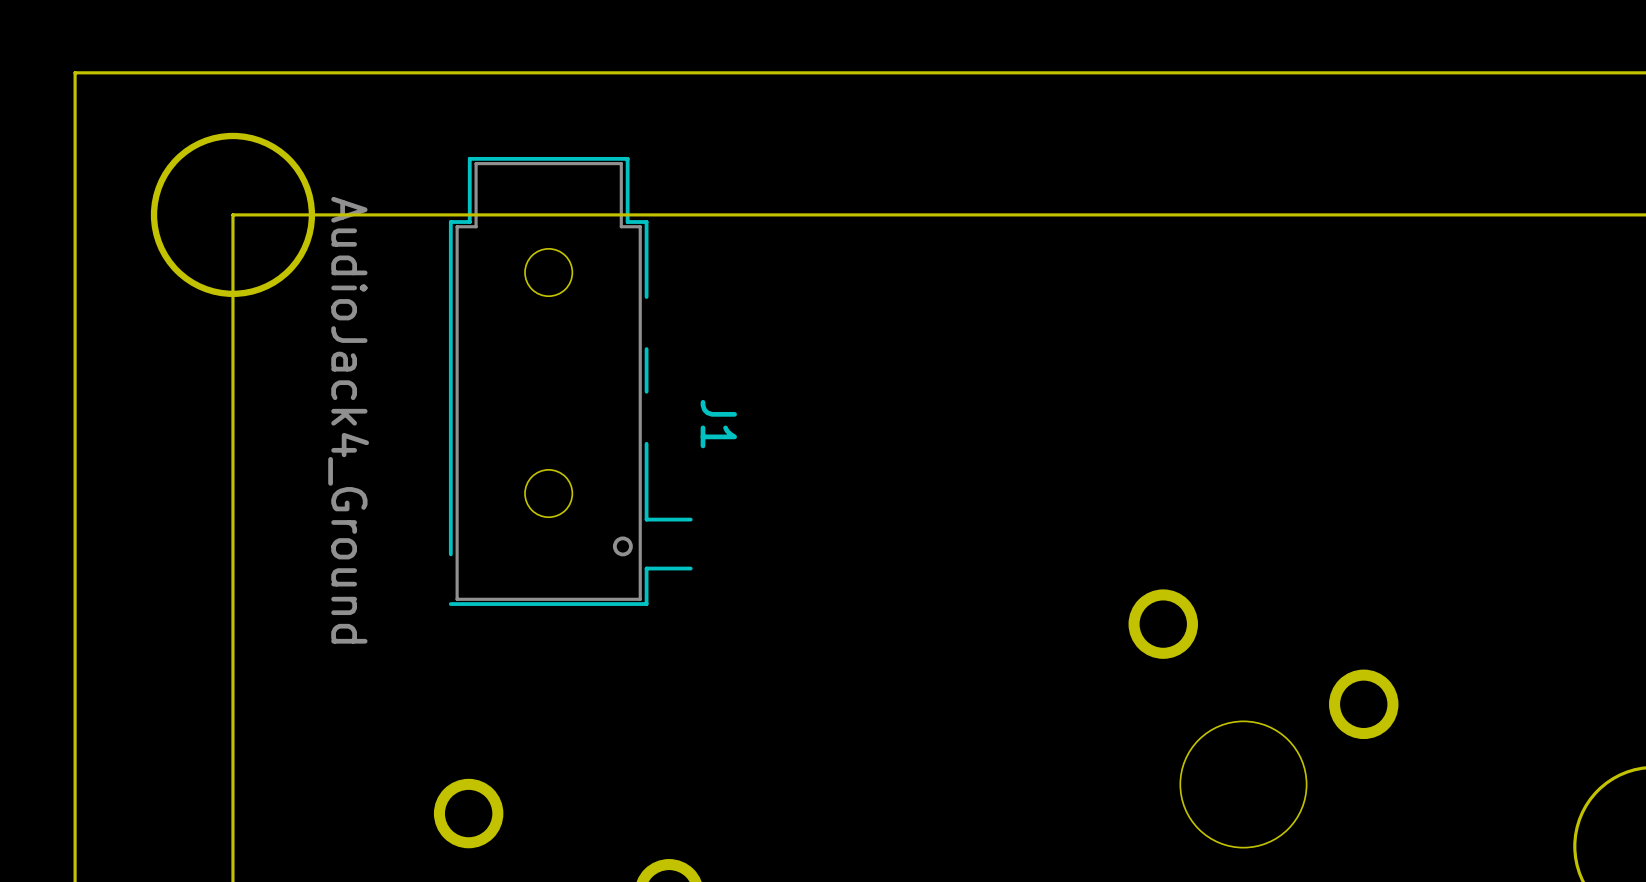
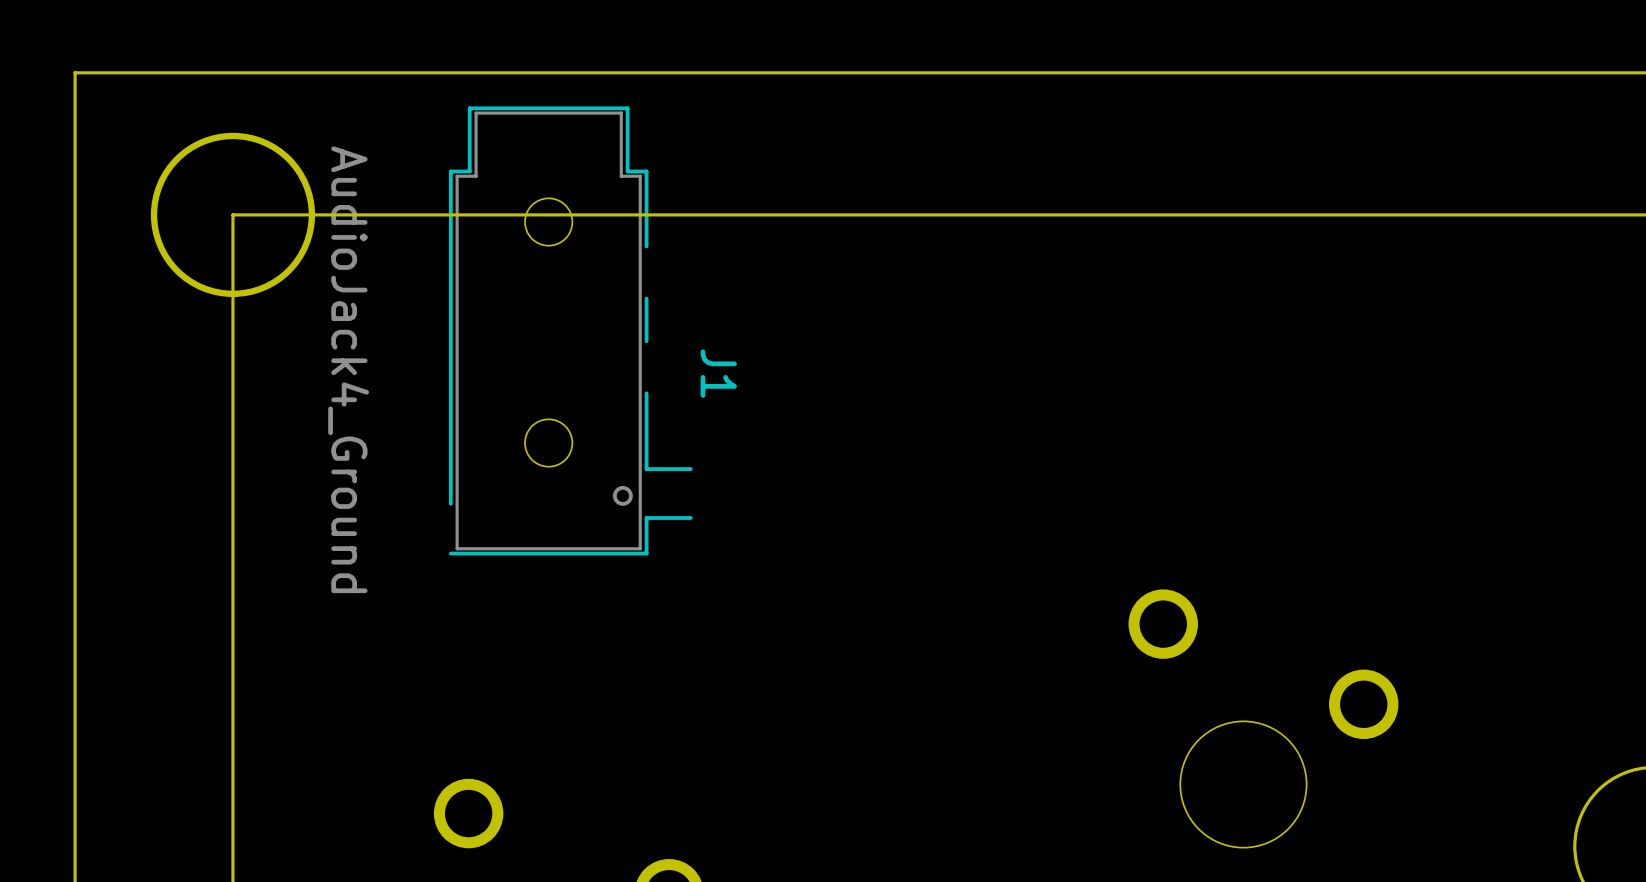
J1 position: (570, 381) -> (570, 330)

